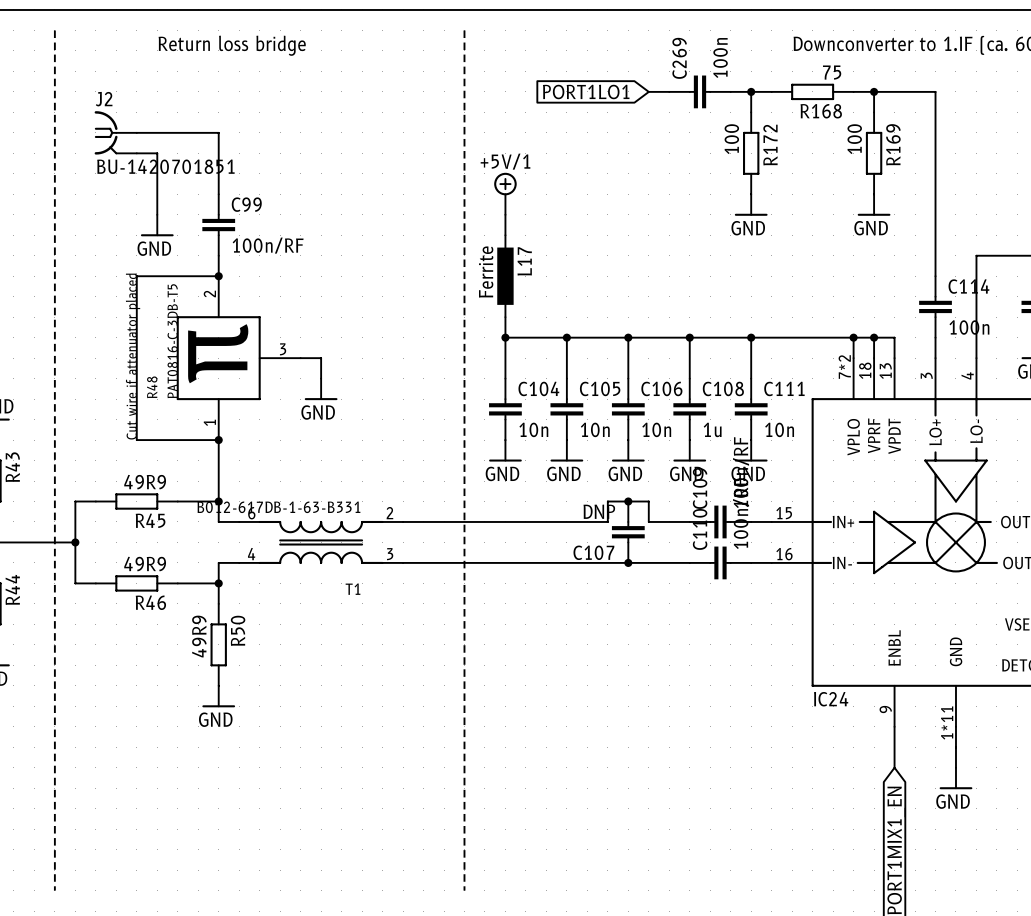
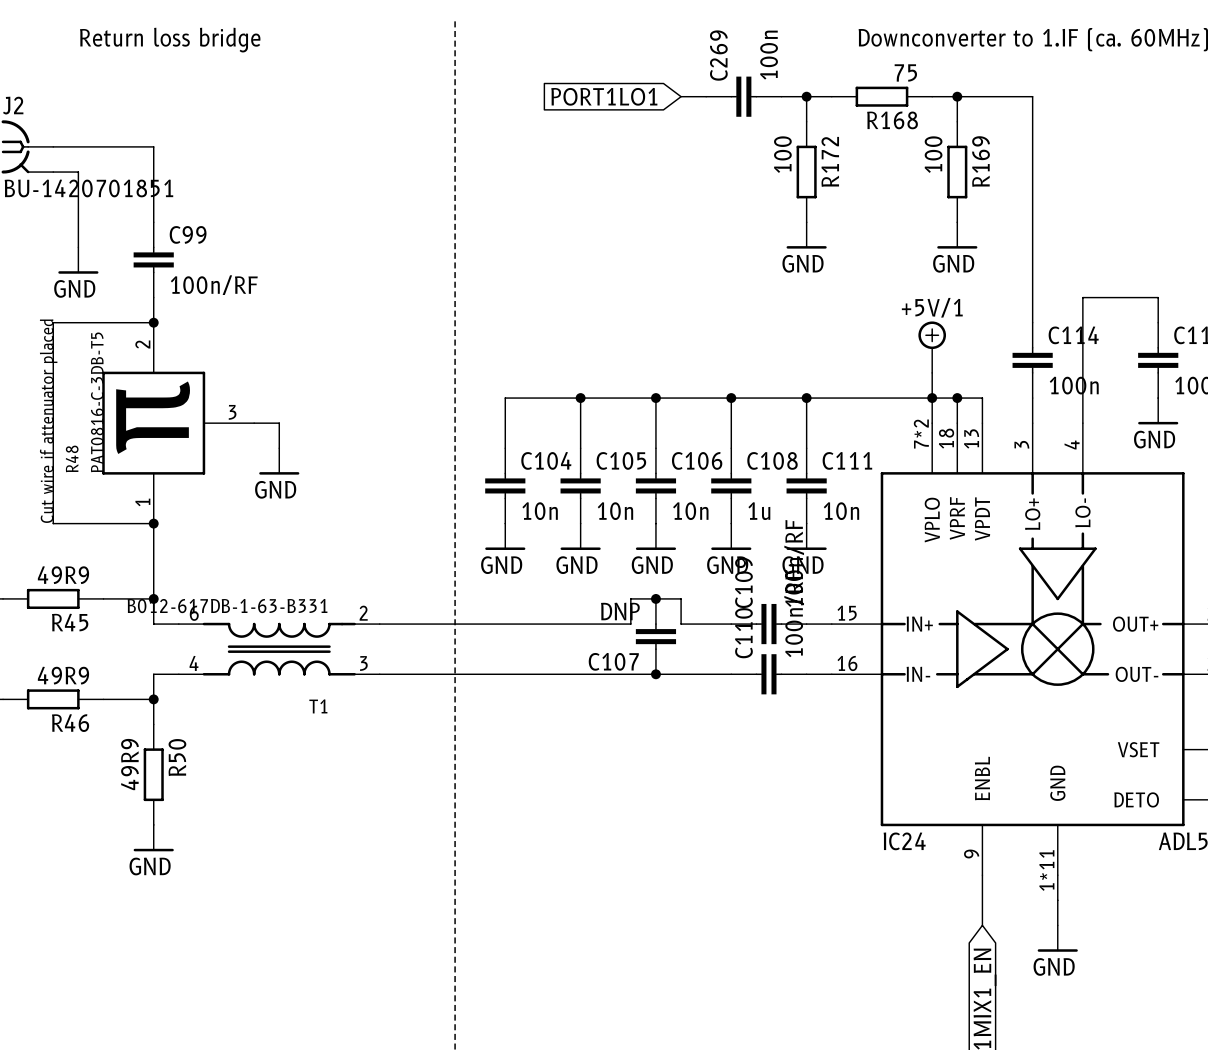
power symbol: +5V/1 (505, 193) -> none
wire: (505, 214) (505, 235) -> none
L17: Ferrite (505, 276) -> none
power symbol: none -> +5V/1 (932, 347)
wire: (505, 317) (505, 337) -> none
wire: none -> (932, 372) (932, 398)
junction: (505, 337) -> none

